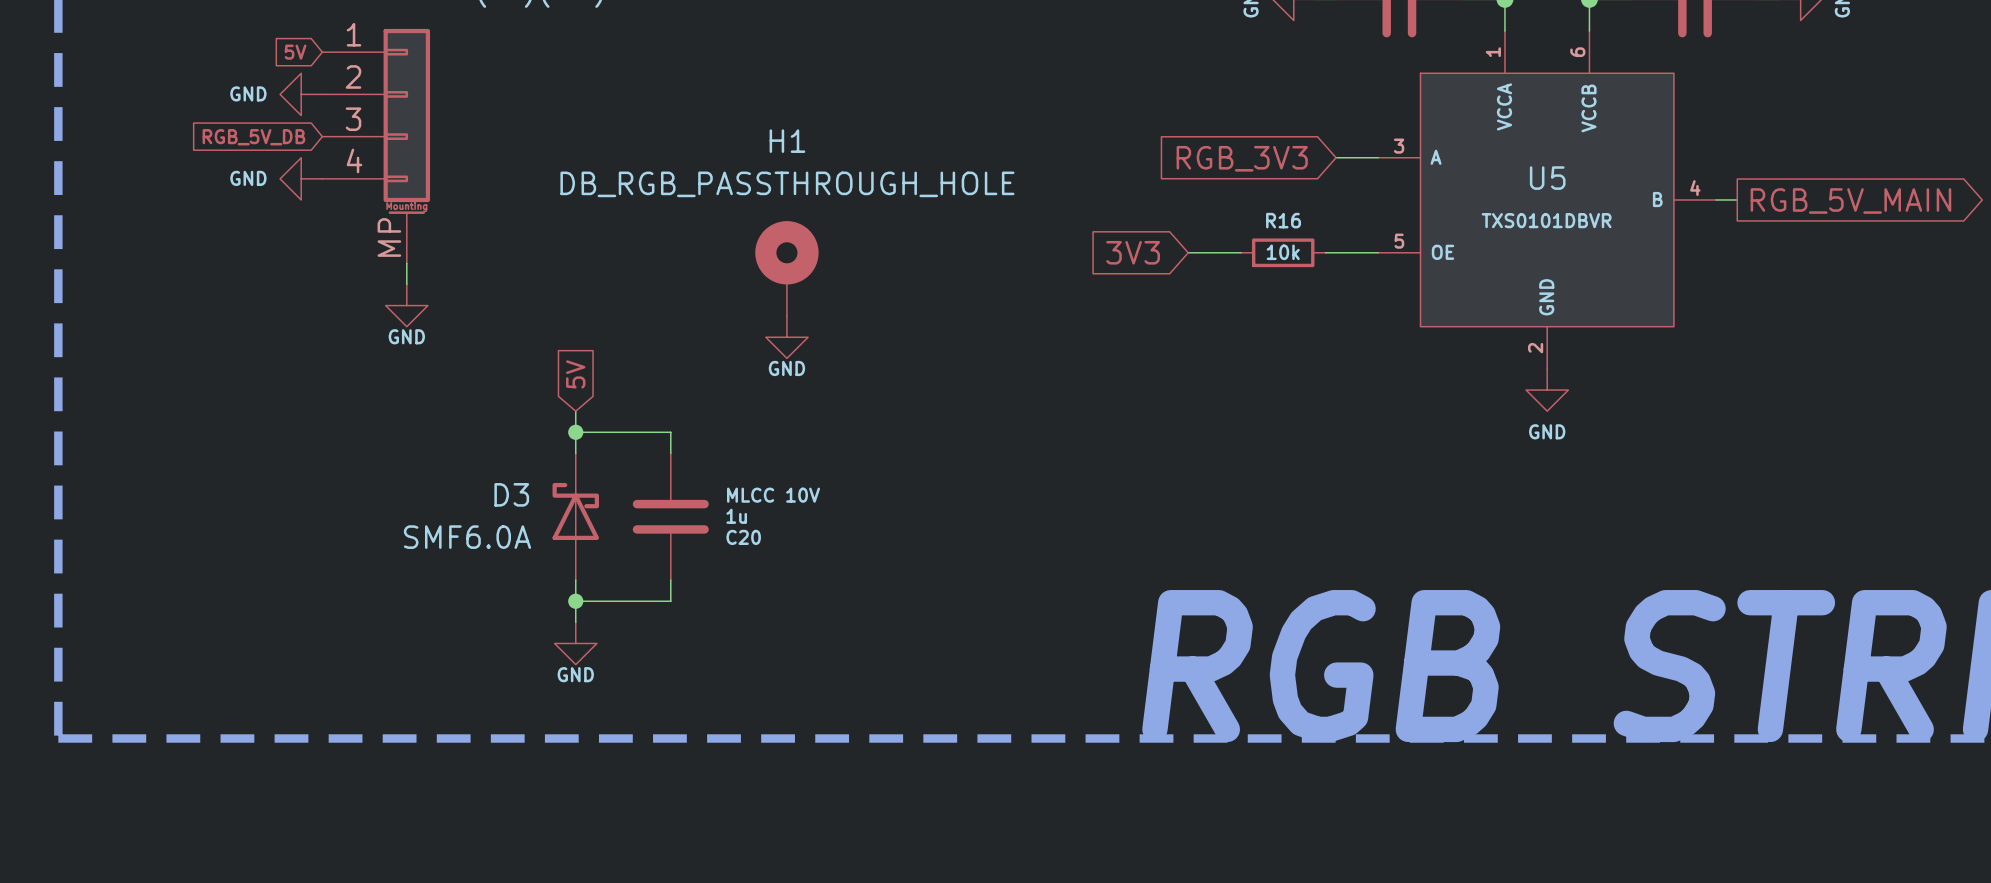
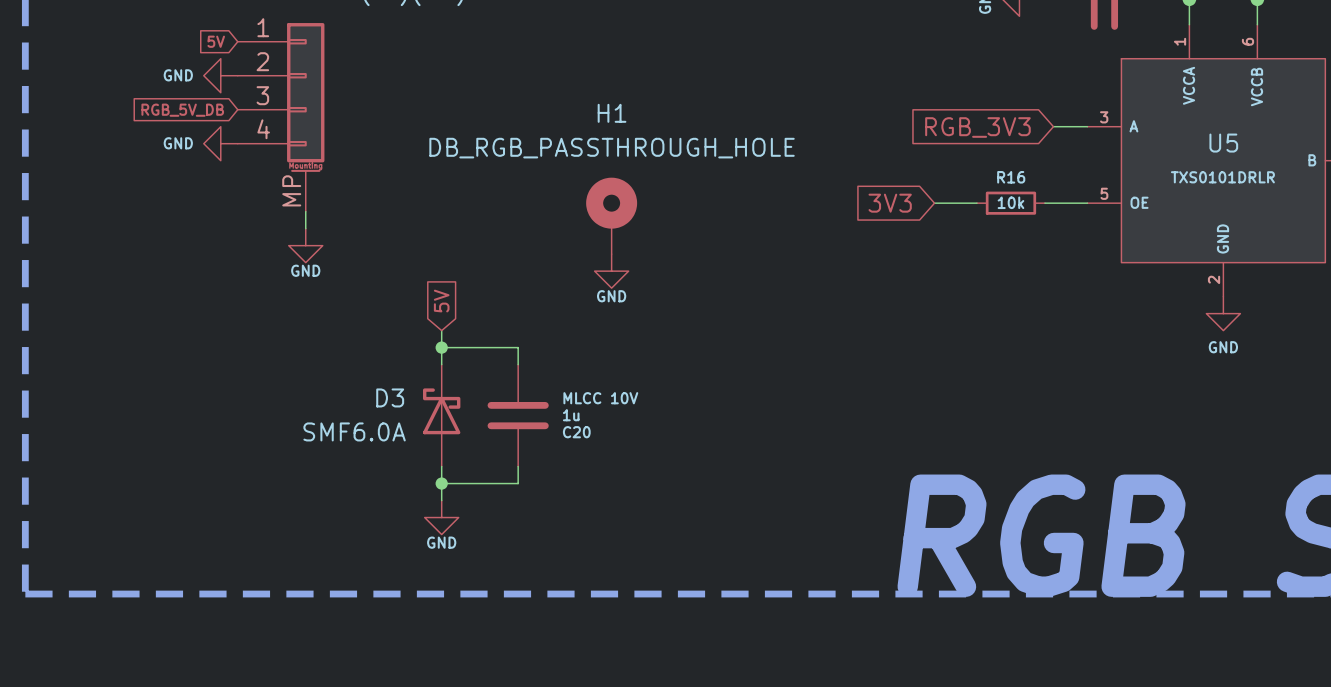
U5 value: TXS0101DBVR (1546, 220) -> TXS0101DRLR (1222, 177)

